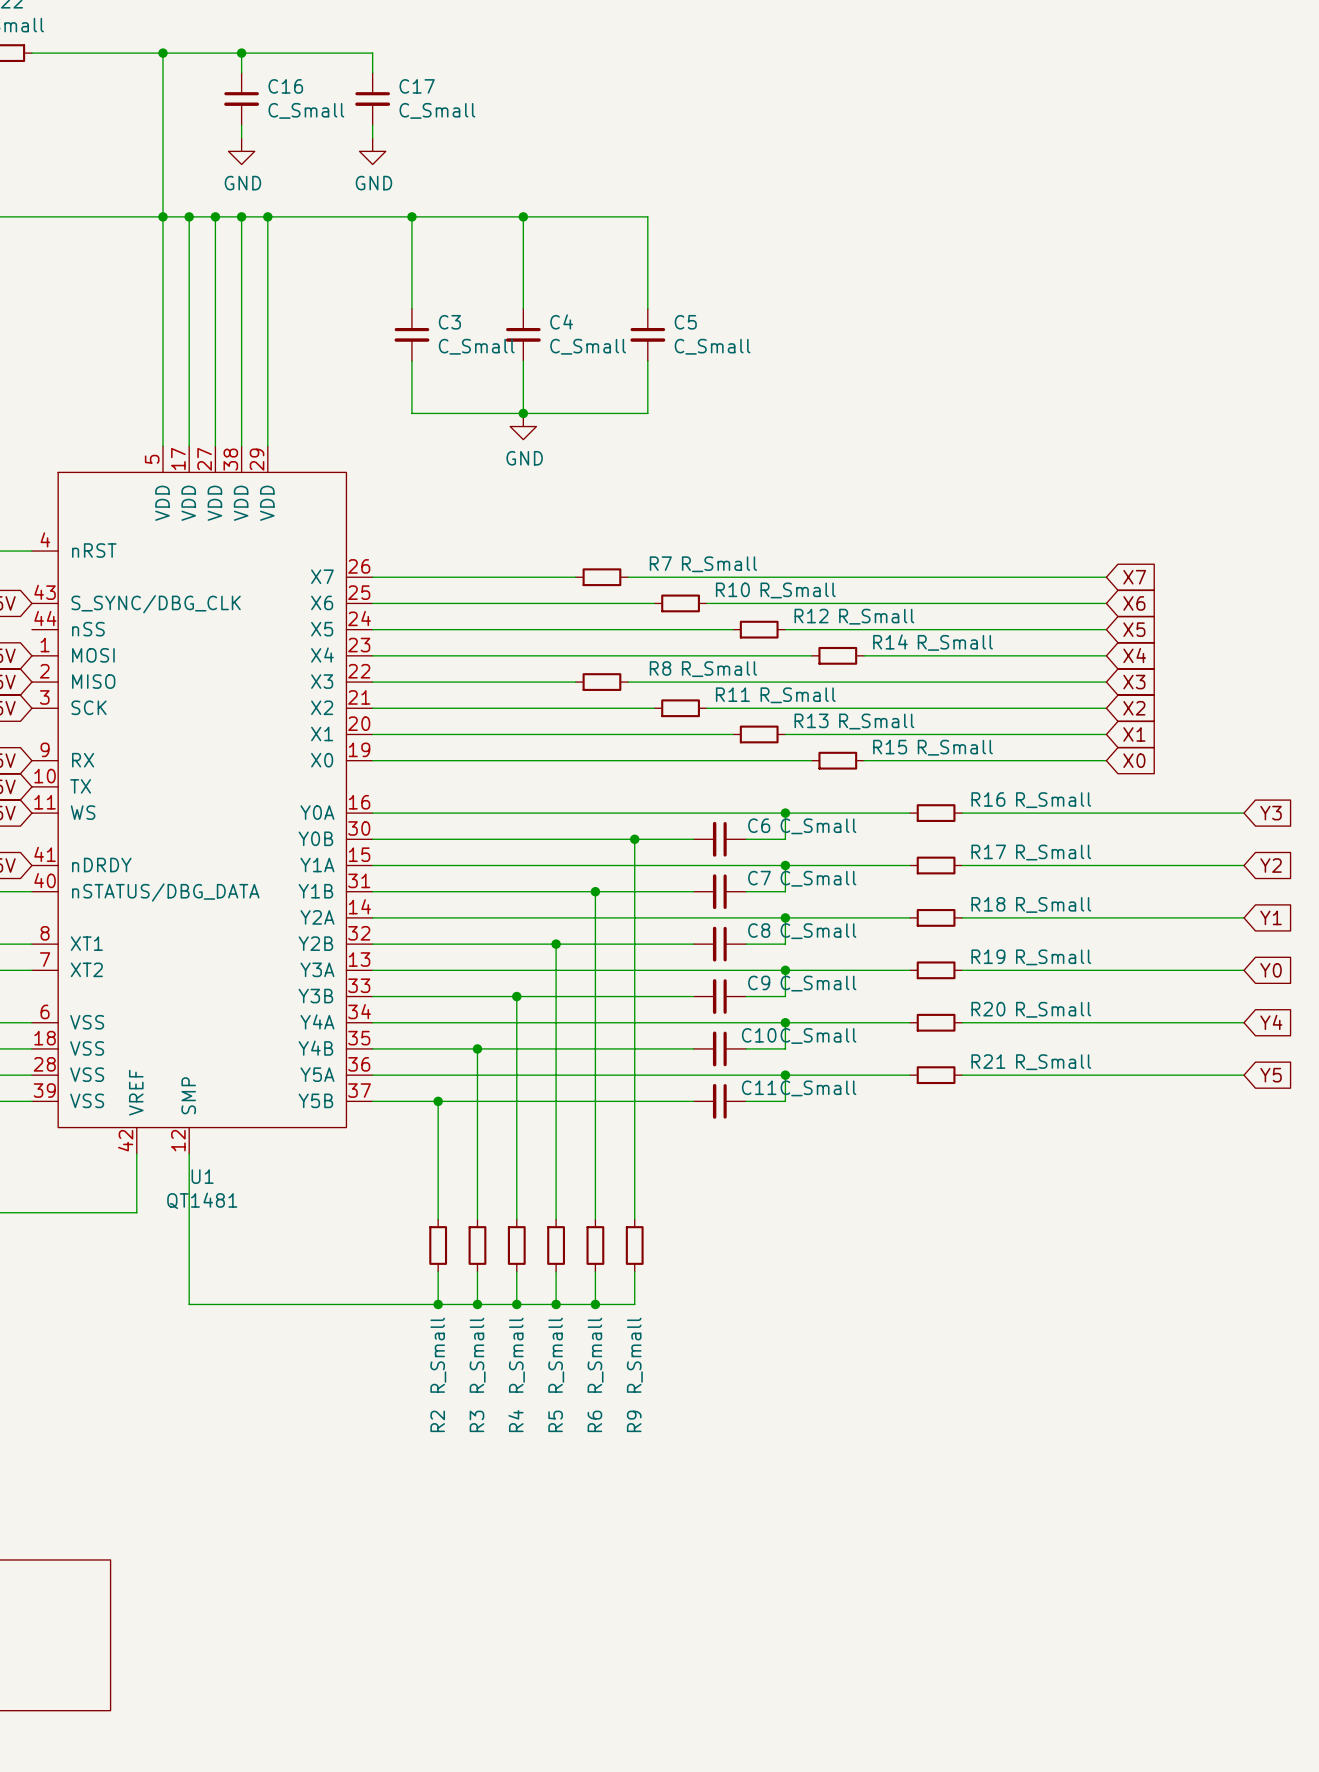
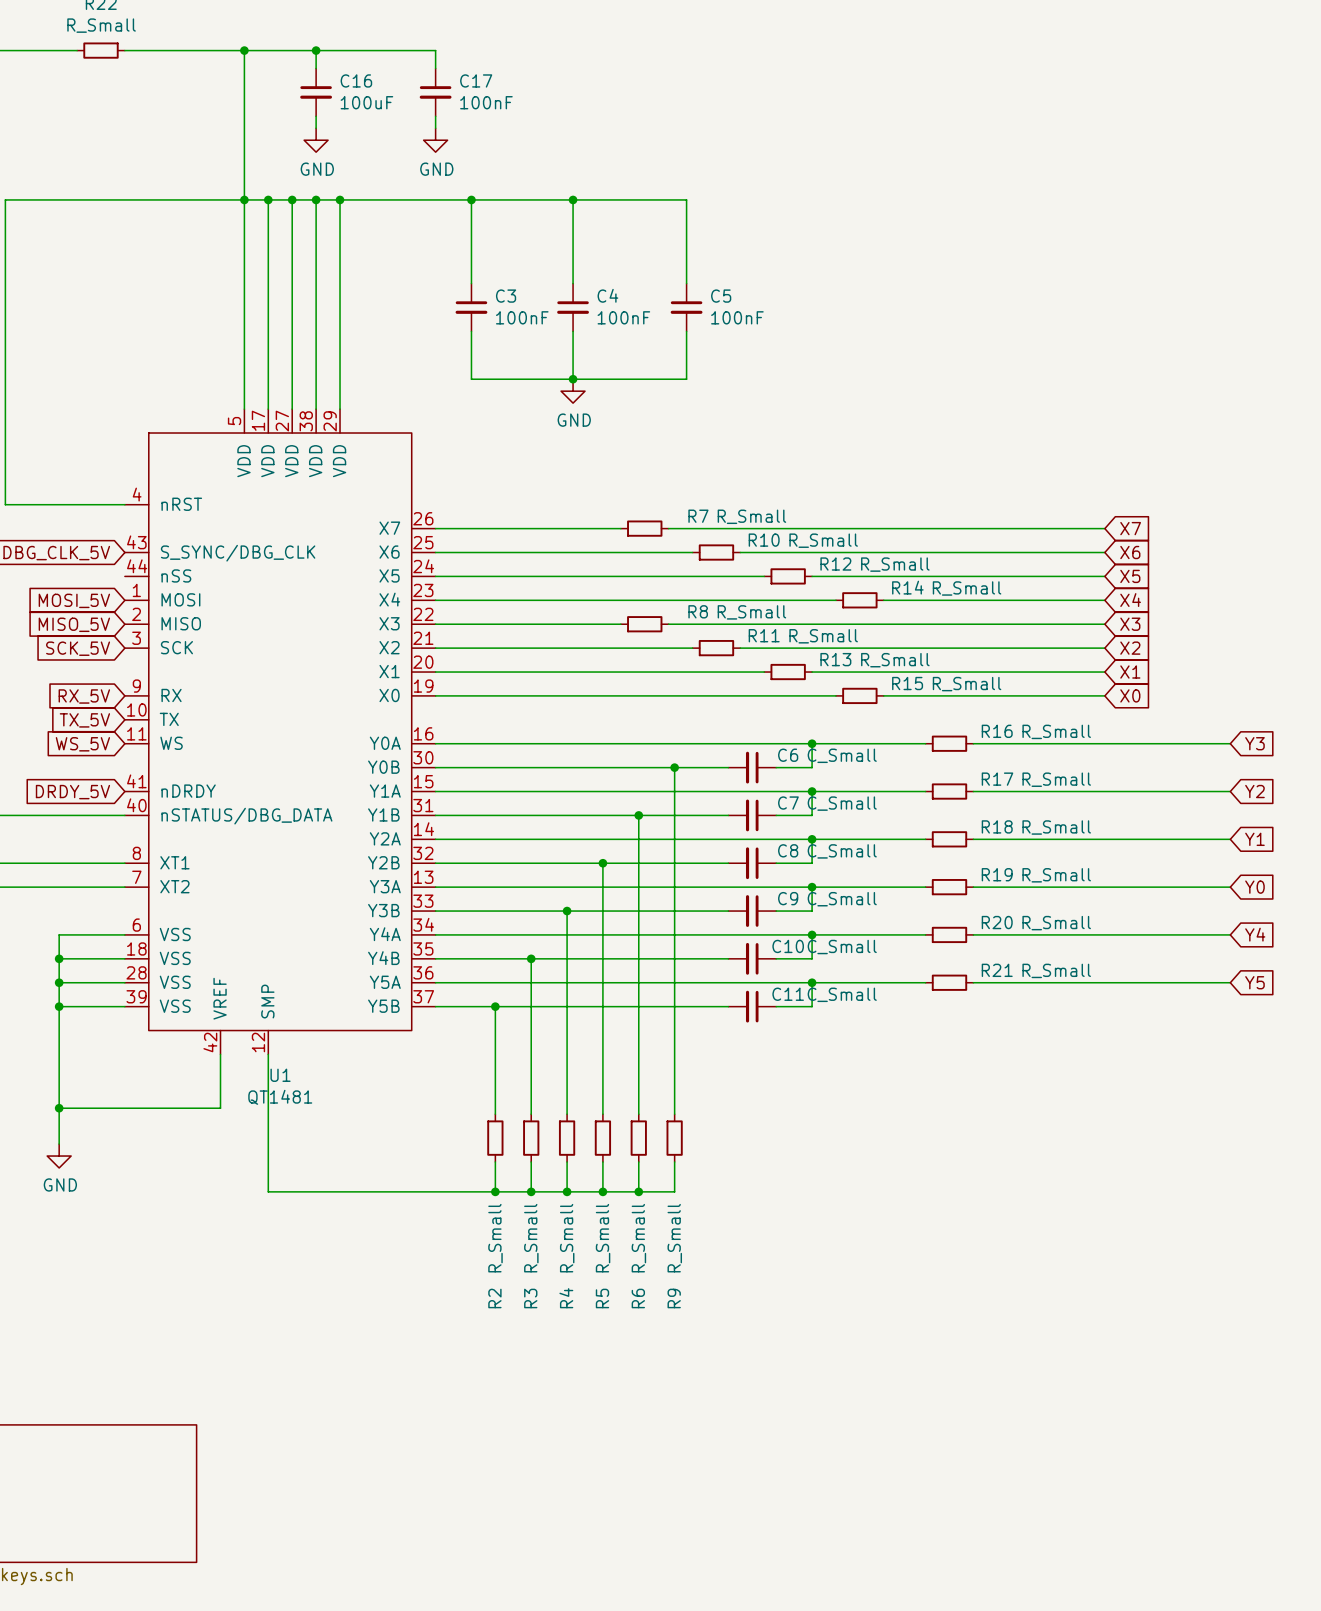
C16 value: C_Small (306, 110) -> 100uF (366, 102)
C17 value: C_Small (437, 110) -> 100nF (486, 102)
C3 value: C_Small (476, 346) -> 100nF (522, 317)
C4 value: C_Small (588, 346) -> 100nF (623, 317)
C5 value: C_Small (712, 346) -> 100nF (737, 317)

